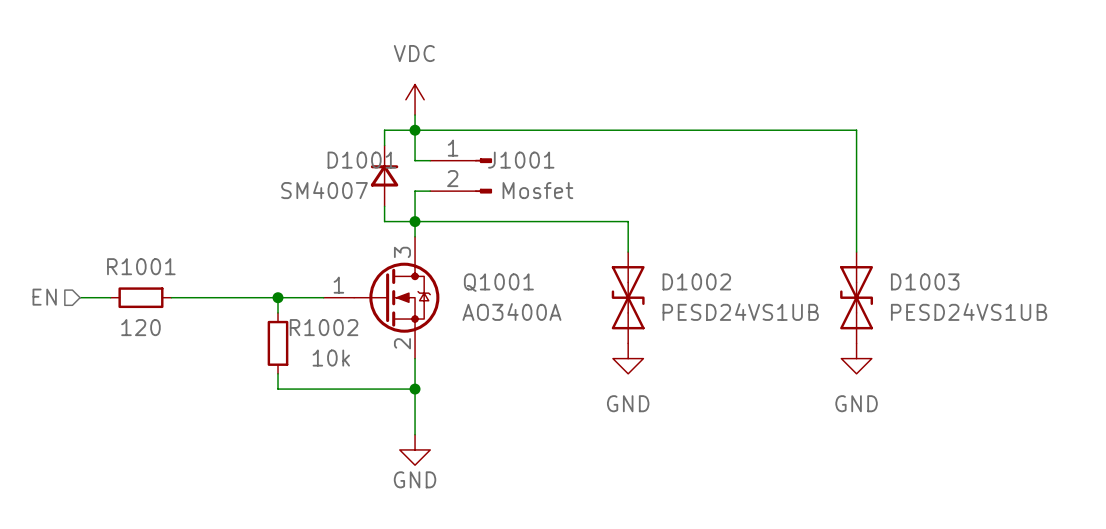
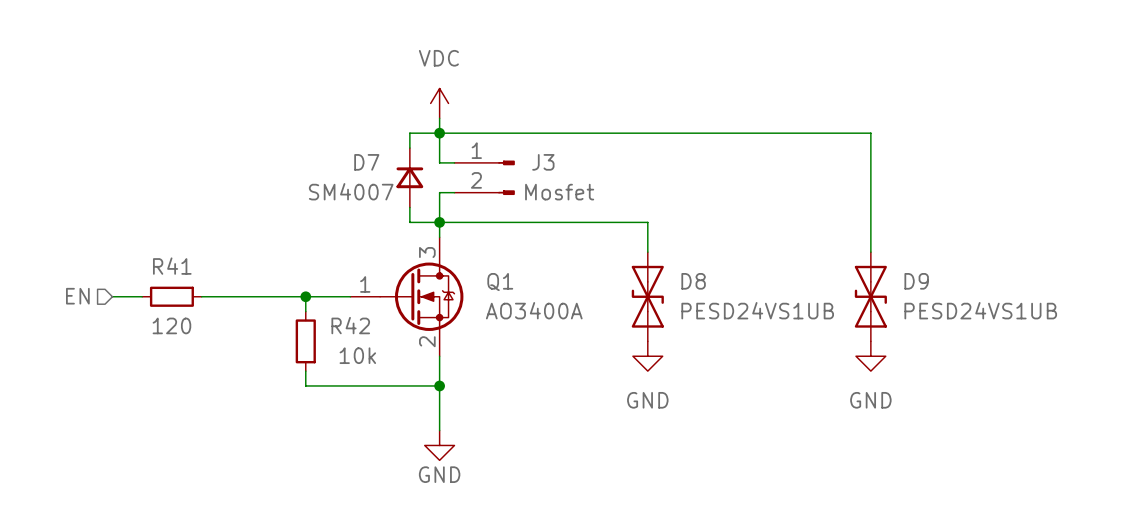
D1001 name: D1001 (361, 160) -> D7 (366, 162)
J1001 name: J1001 (521, 160) -> J3 (543, 162)
R1001 name: R1001 (141, 266) -> R41 (172, 266)
D1002 name: D1002 (696, 281) -> D8 (693, 281)
D1003 name: D1003 (925, 281) -> D9 (916, 281)
Q1001 name: Q1001 (498, 282) -> Q1 (500, 282)
R1002 name: R1002 (324, 327) -> R42 (350, 325)

